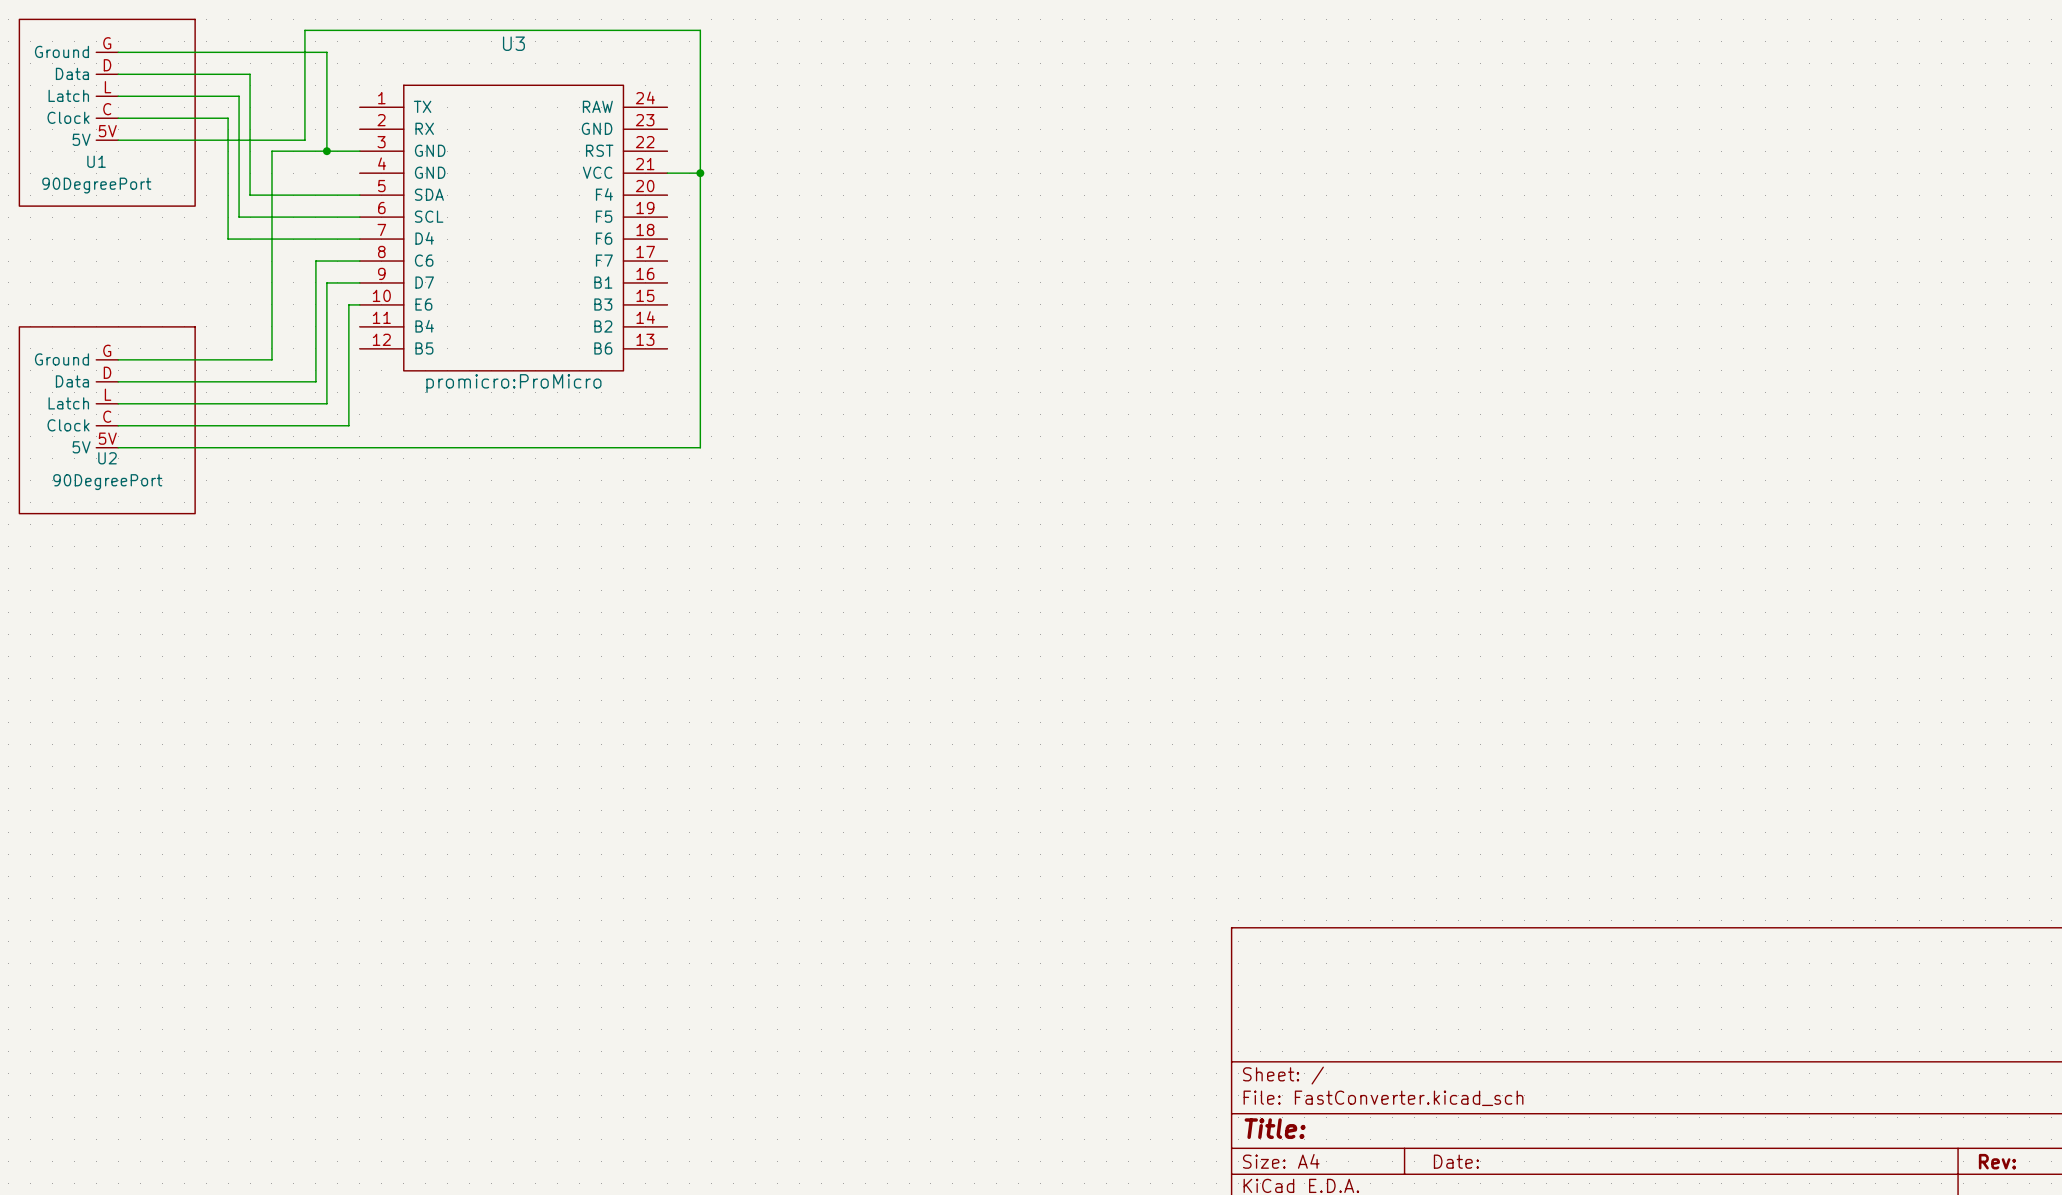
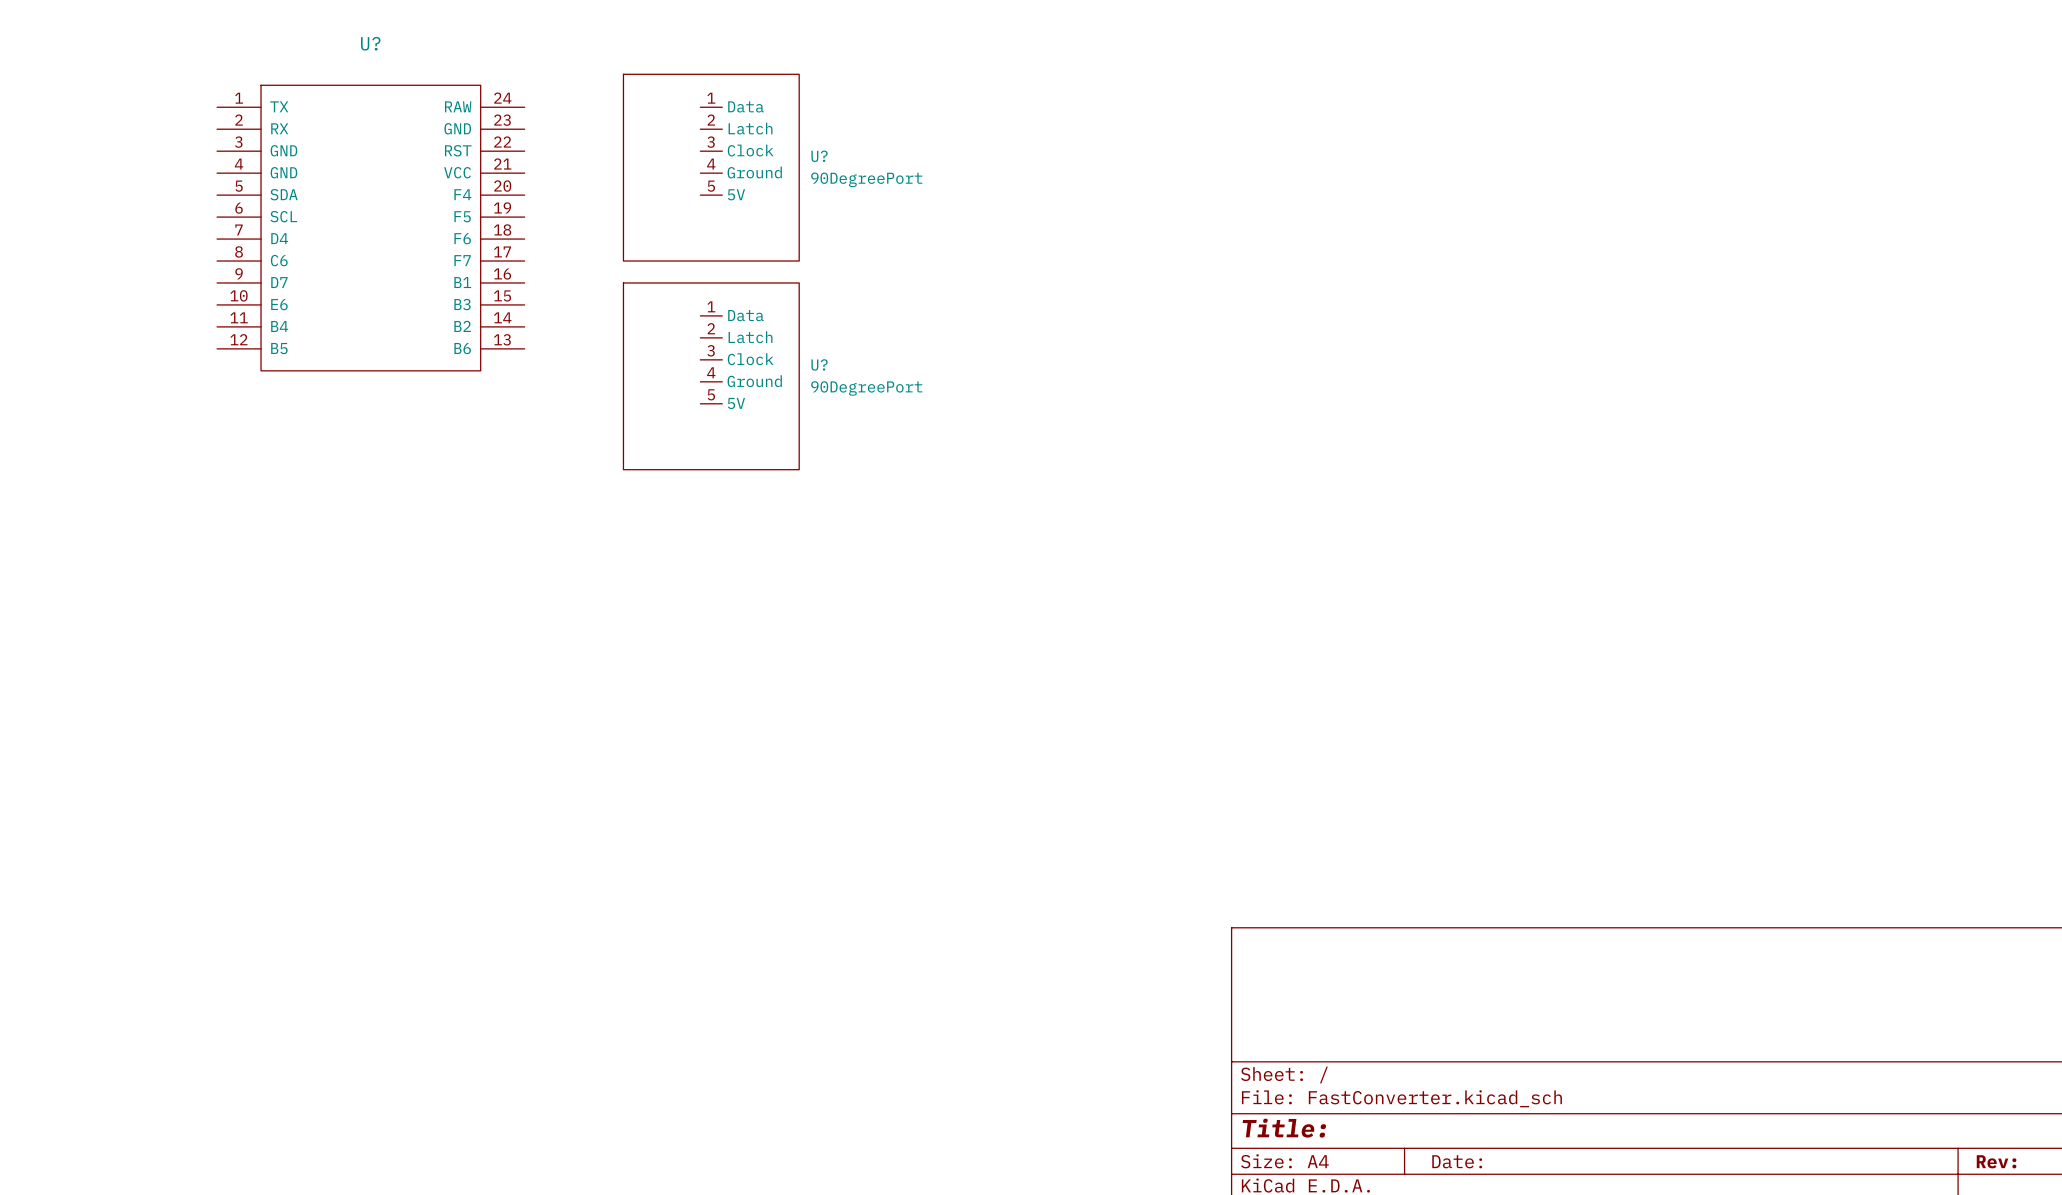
wire: (118, 52) (326, 52) (326, 151) -> none
wire: (118, 74) (250, 74) (250, 195) (359, 195) -> none
wire: (118, 96) (239, 96) (239, 217) (359, 217) -> none
U1: 90DegreePort (107, 112) -> none
wire: (118, 118) (228, 118) (228, 239) (359, 239) -> none
wire: (118, 140) (304, 140) (304, 30) (700, 30) (700, 447) (118, 447) -> none
junction: (326, 151) -> none
wire: (359, 151) (271, 151) (271, 359) (118, 359) -> none
U?: none -> 90DegreePort (711, 167)
wire: (667, 173) (700, 173) -> none
junction: (700, 173) -> none
U?: none -> (370, 228)
U3: (513, 228) -> none
wire: (359, 261) (315, 261) (315, 381) (118, 381) -> none
wire: (359, 282) (326, 282) (326, 403) (118, 403) -> none
wire: (359, 304) (348, 304) (348, 425) (118, 425) -> none
U?: none -> 90DegreePort (711, 376)
U2: 90DegreePort (107, 420) -> none

